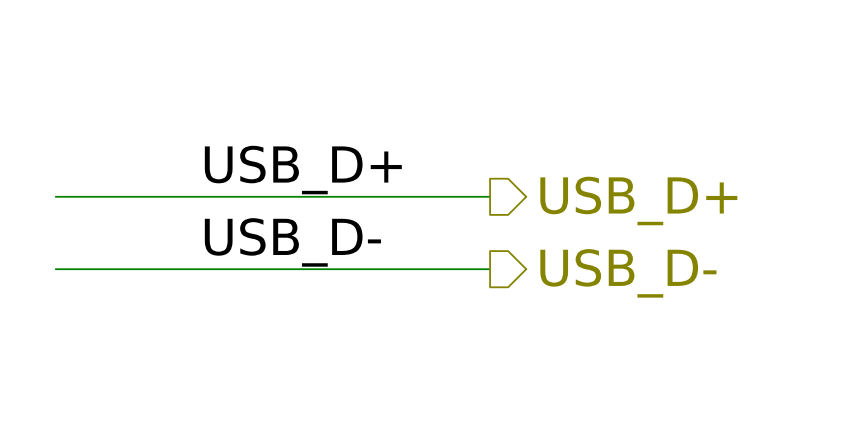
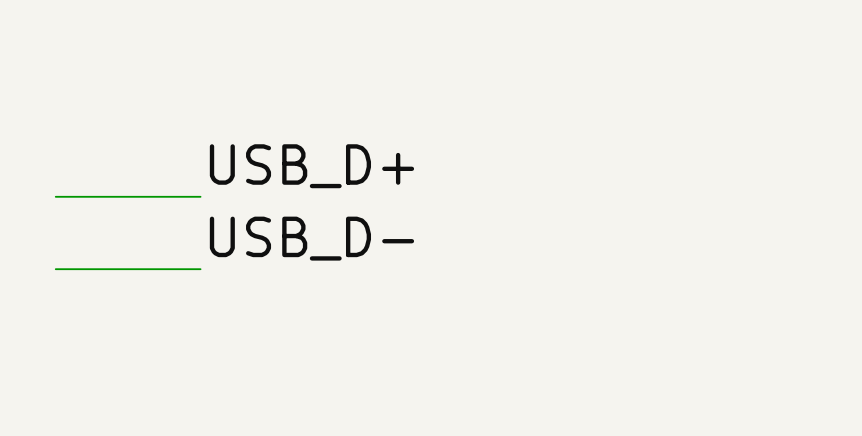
wire: (200, 196) (490, 196) -> none
hierarchical label: USB_D+ (638, 200) -> none
wire: (200, 269) (490, 269) -> none
hierarchical label: USB_D- (628, 273) -> none

